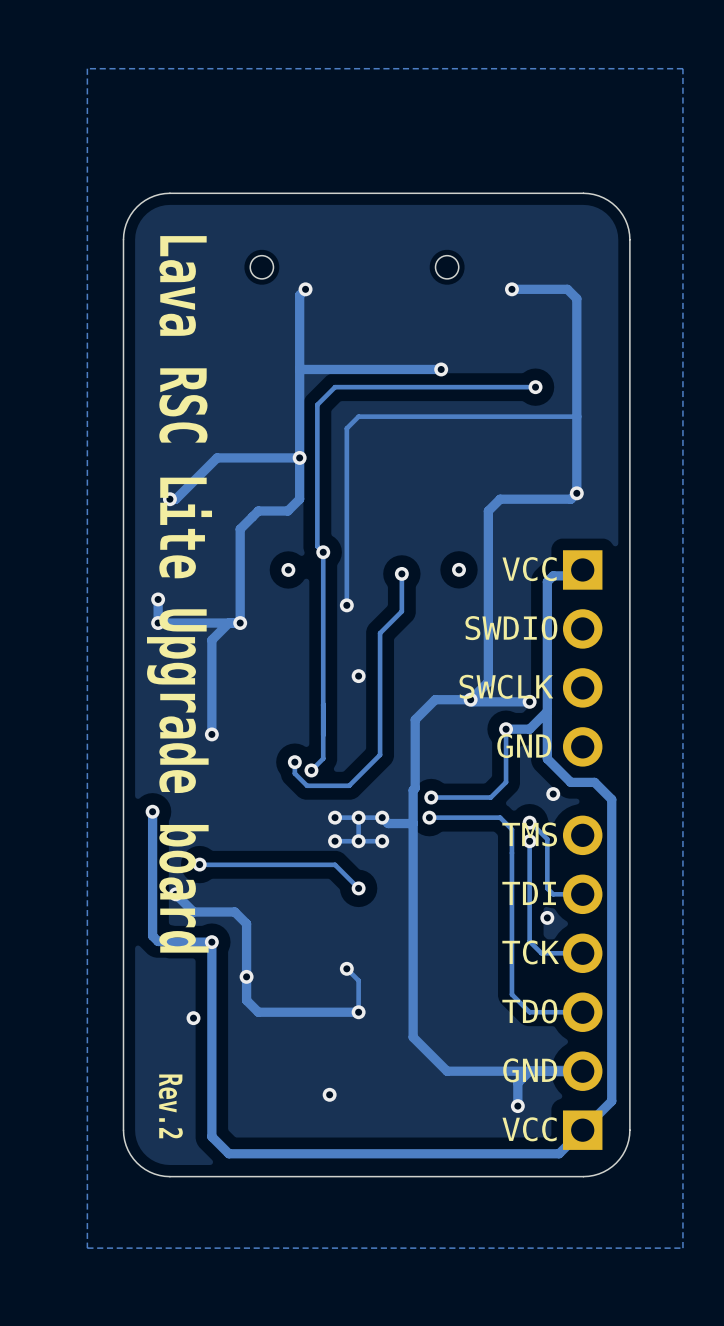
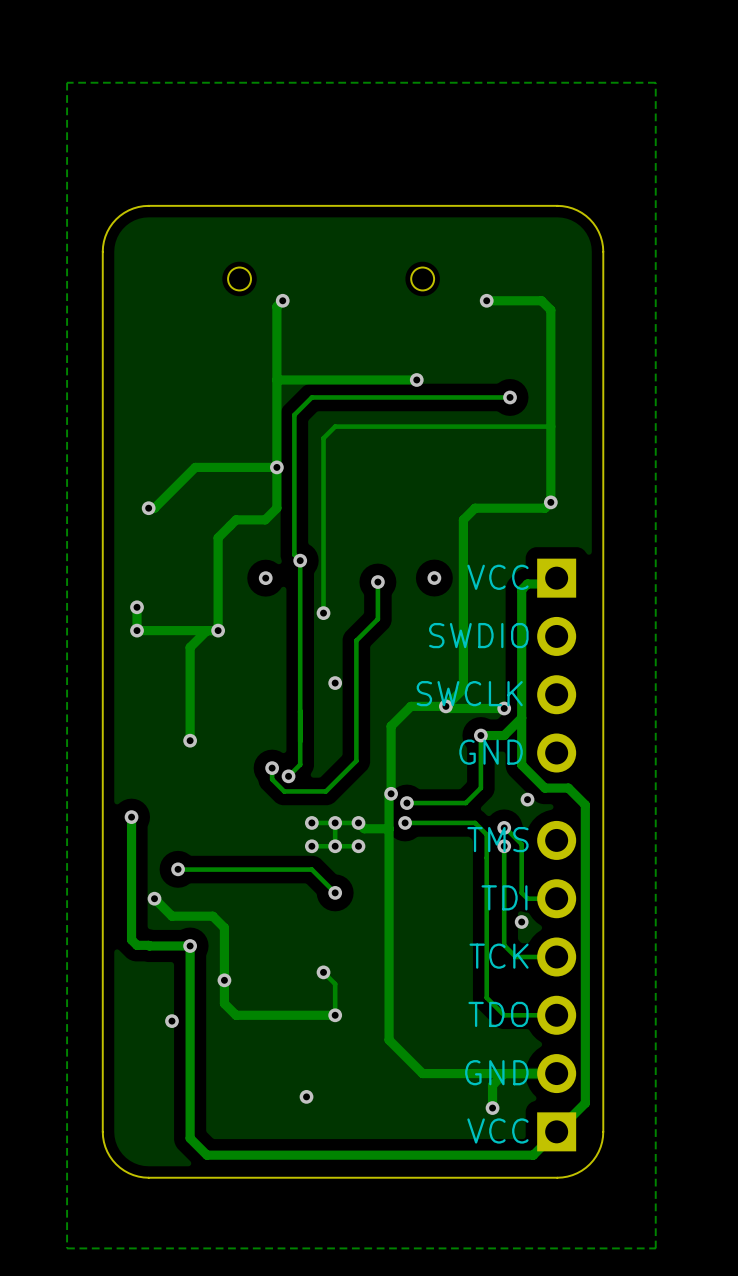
text: Lava RSC Lite Upgrade board (179, 594) -> none
via: none -> (391, 793)
text: Rev.2 (170, 1106) -> none

